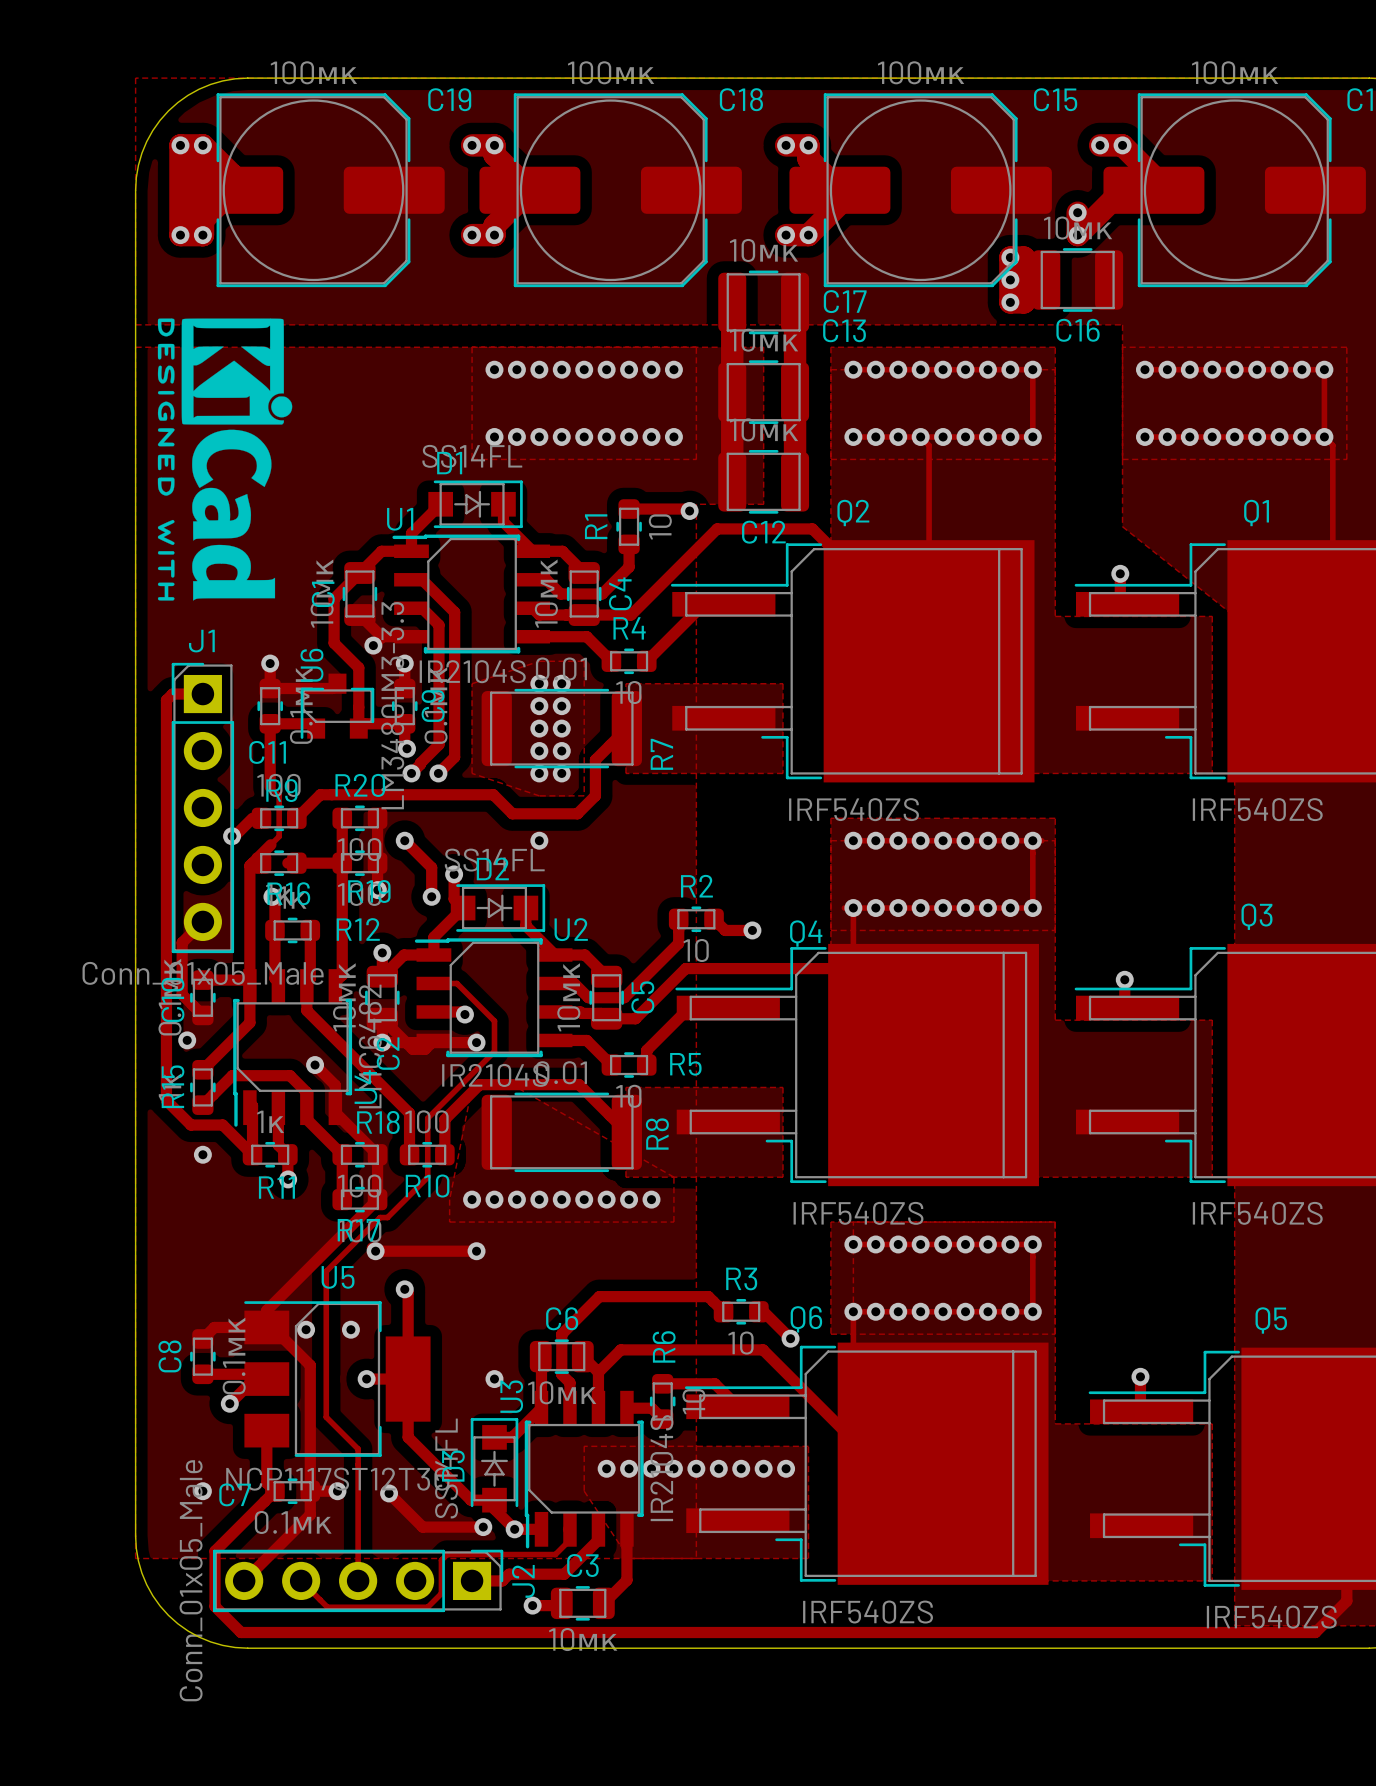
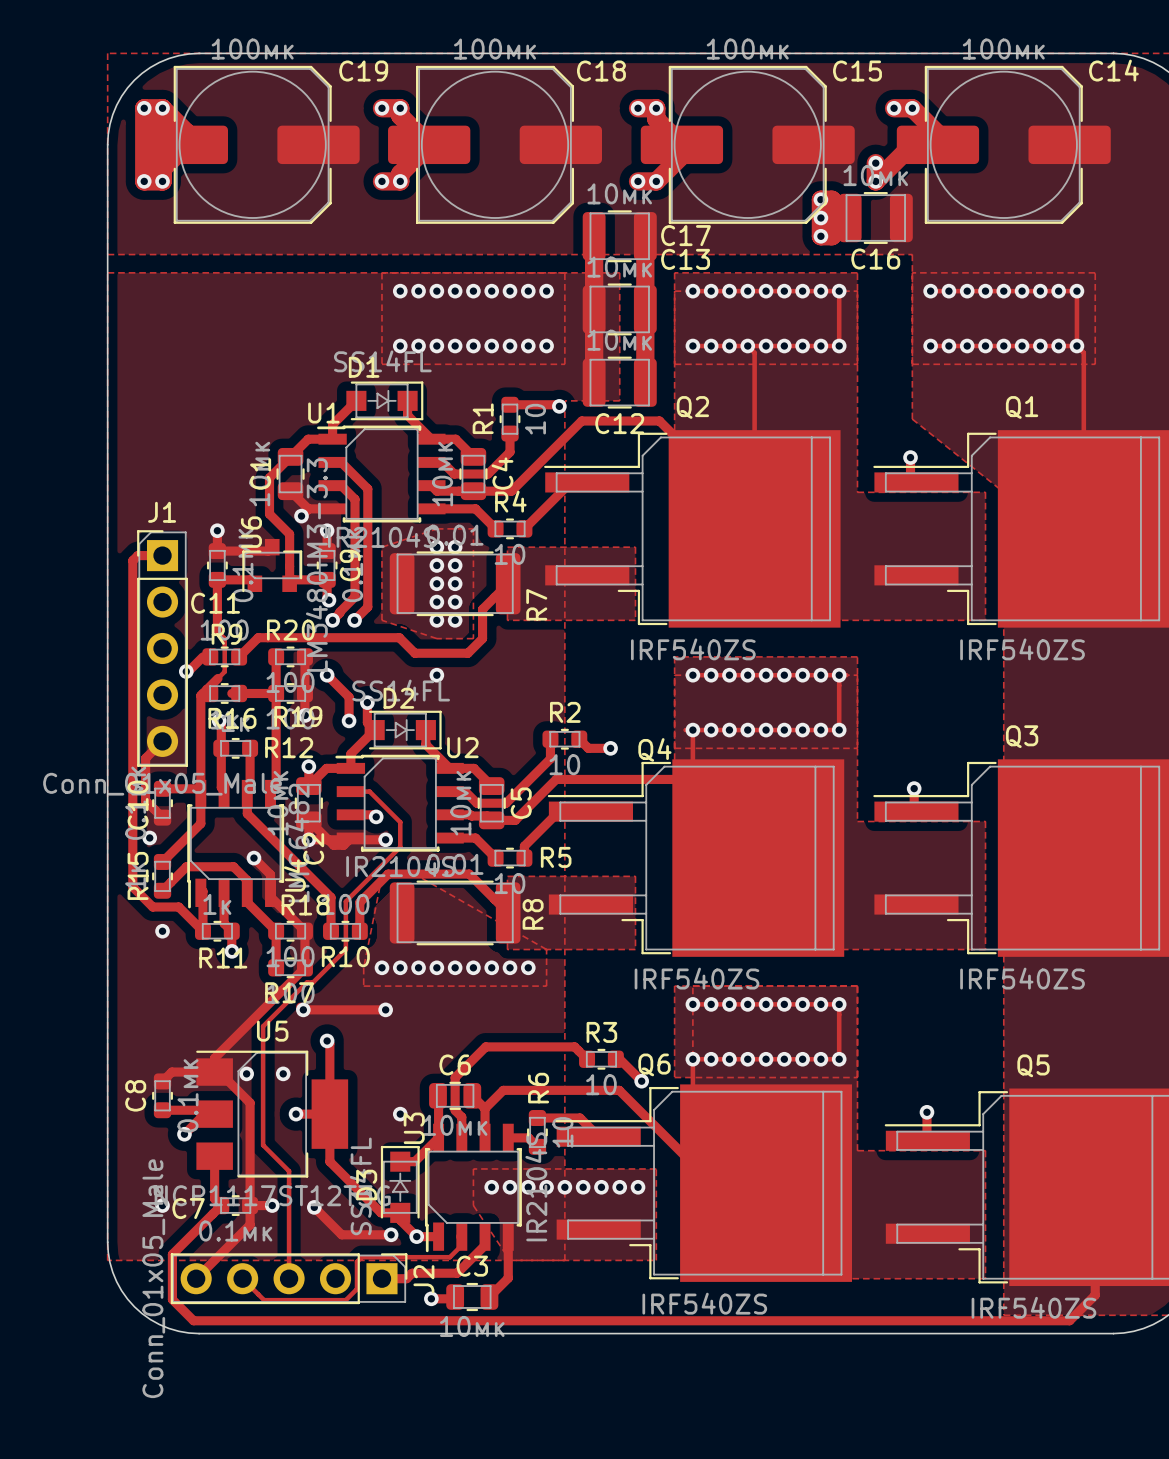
drawing: [157, 318, 293, 601] -> none

